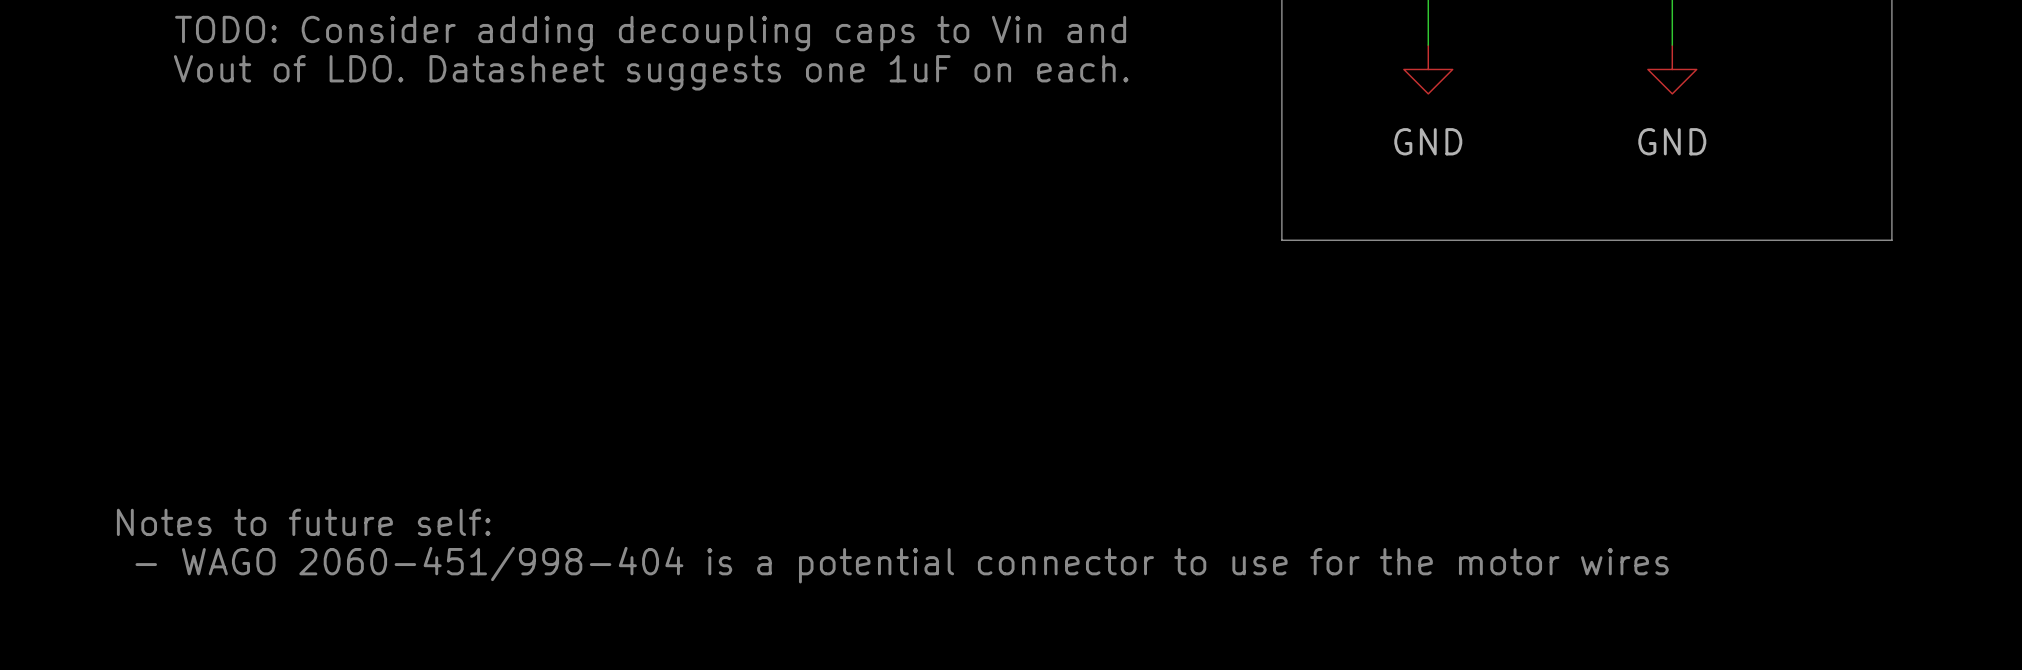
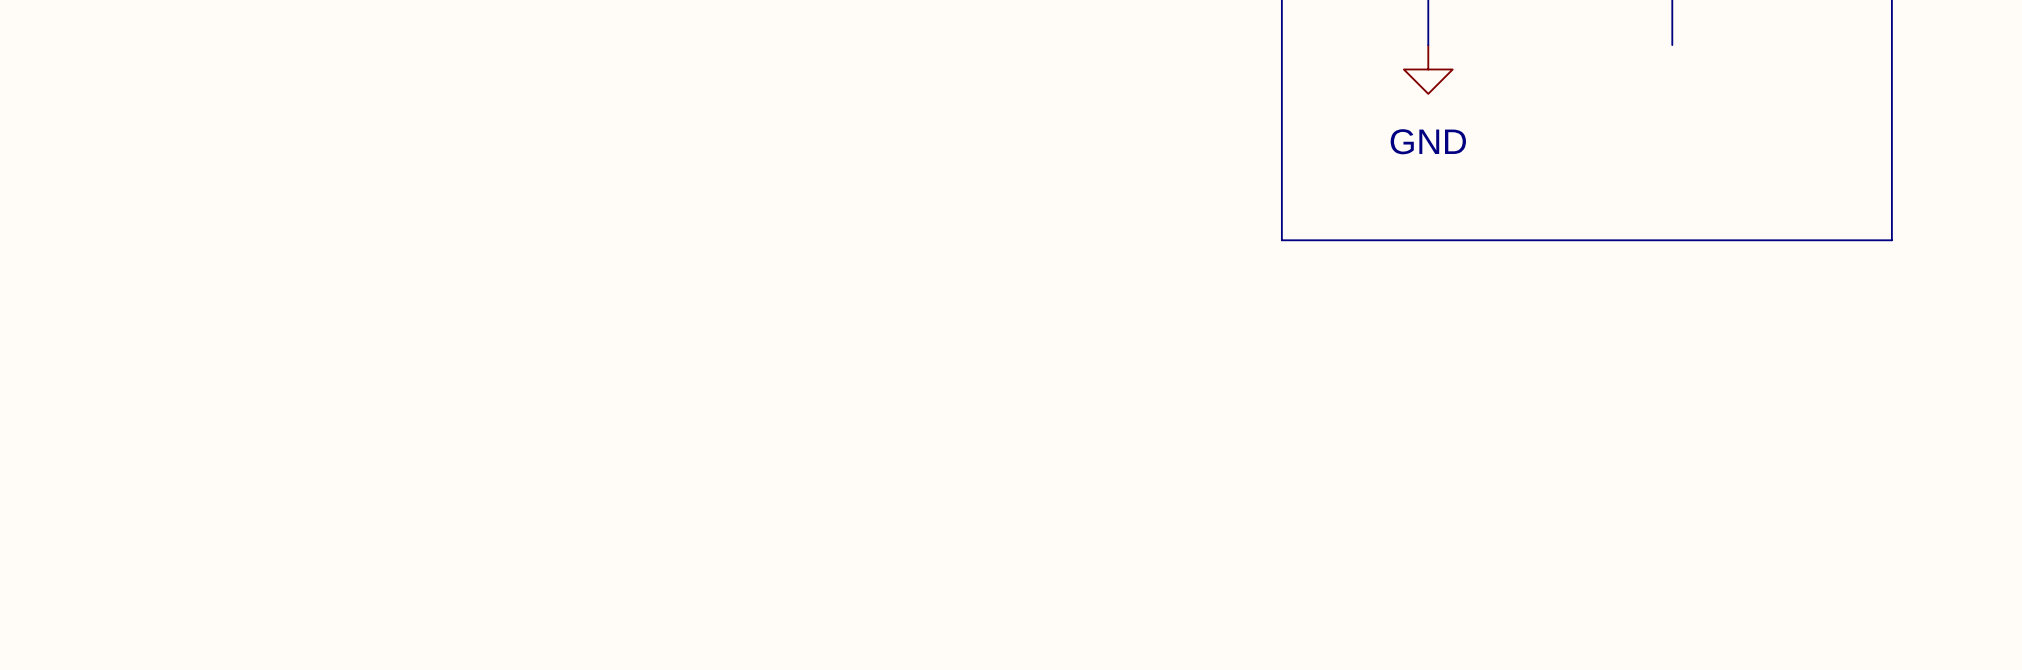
text: TODO: Consider adding decoupling caps to Vin and (650, 33) -> none
power symbol: GND (1672, 69) -> none
text: Vout of LDO. Datasheet suggests one 1uF on each. (651, 72) -> none
text: Notes to future self: (303, 522) -> none
text: - WAGO 2060-451/998-404 is a potential connector to use for the motor wires (902, 565) -> none

